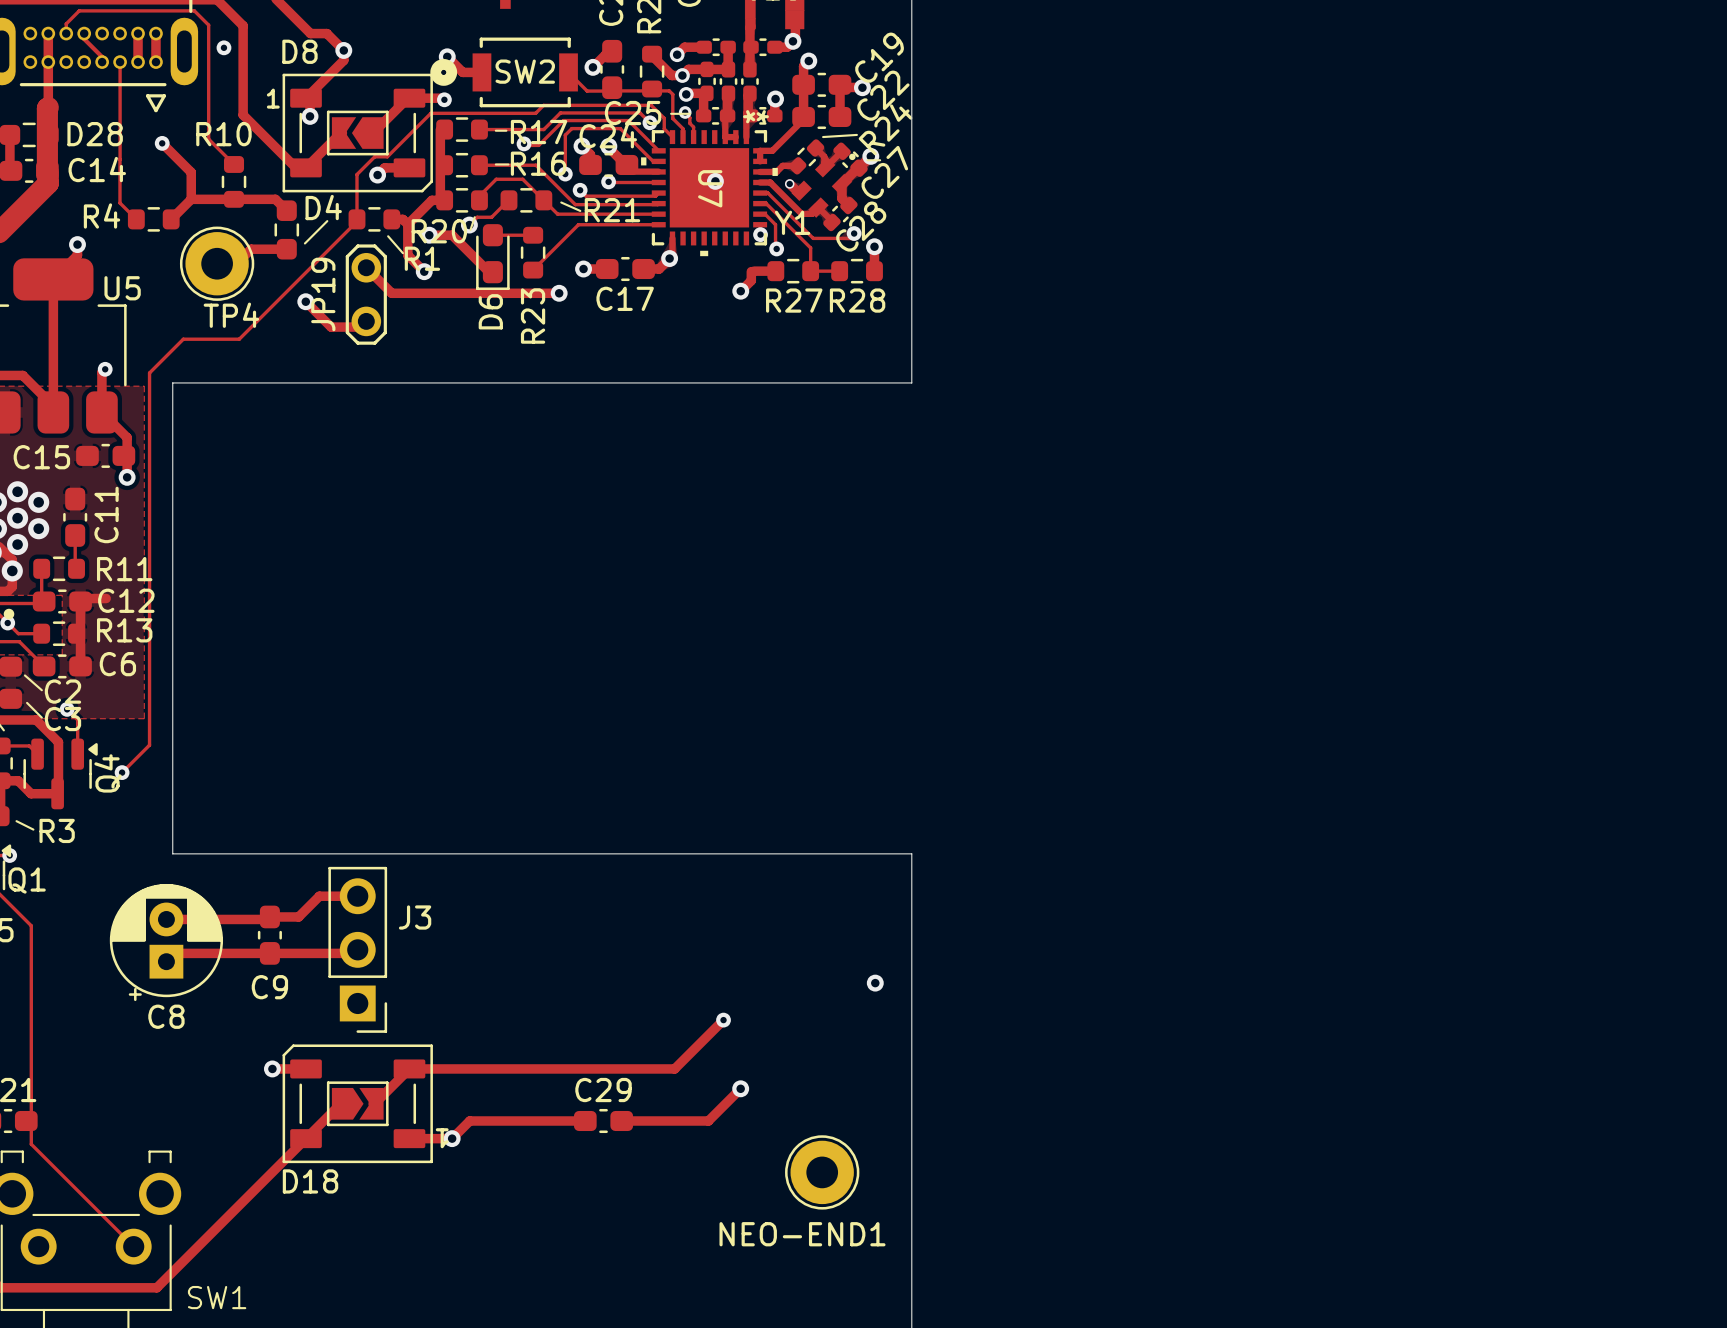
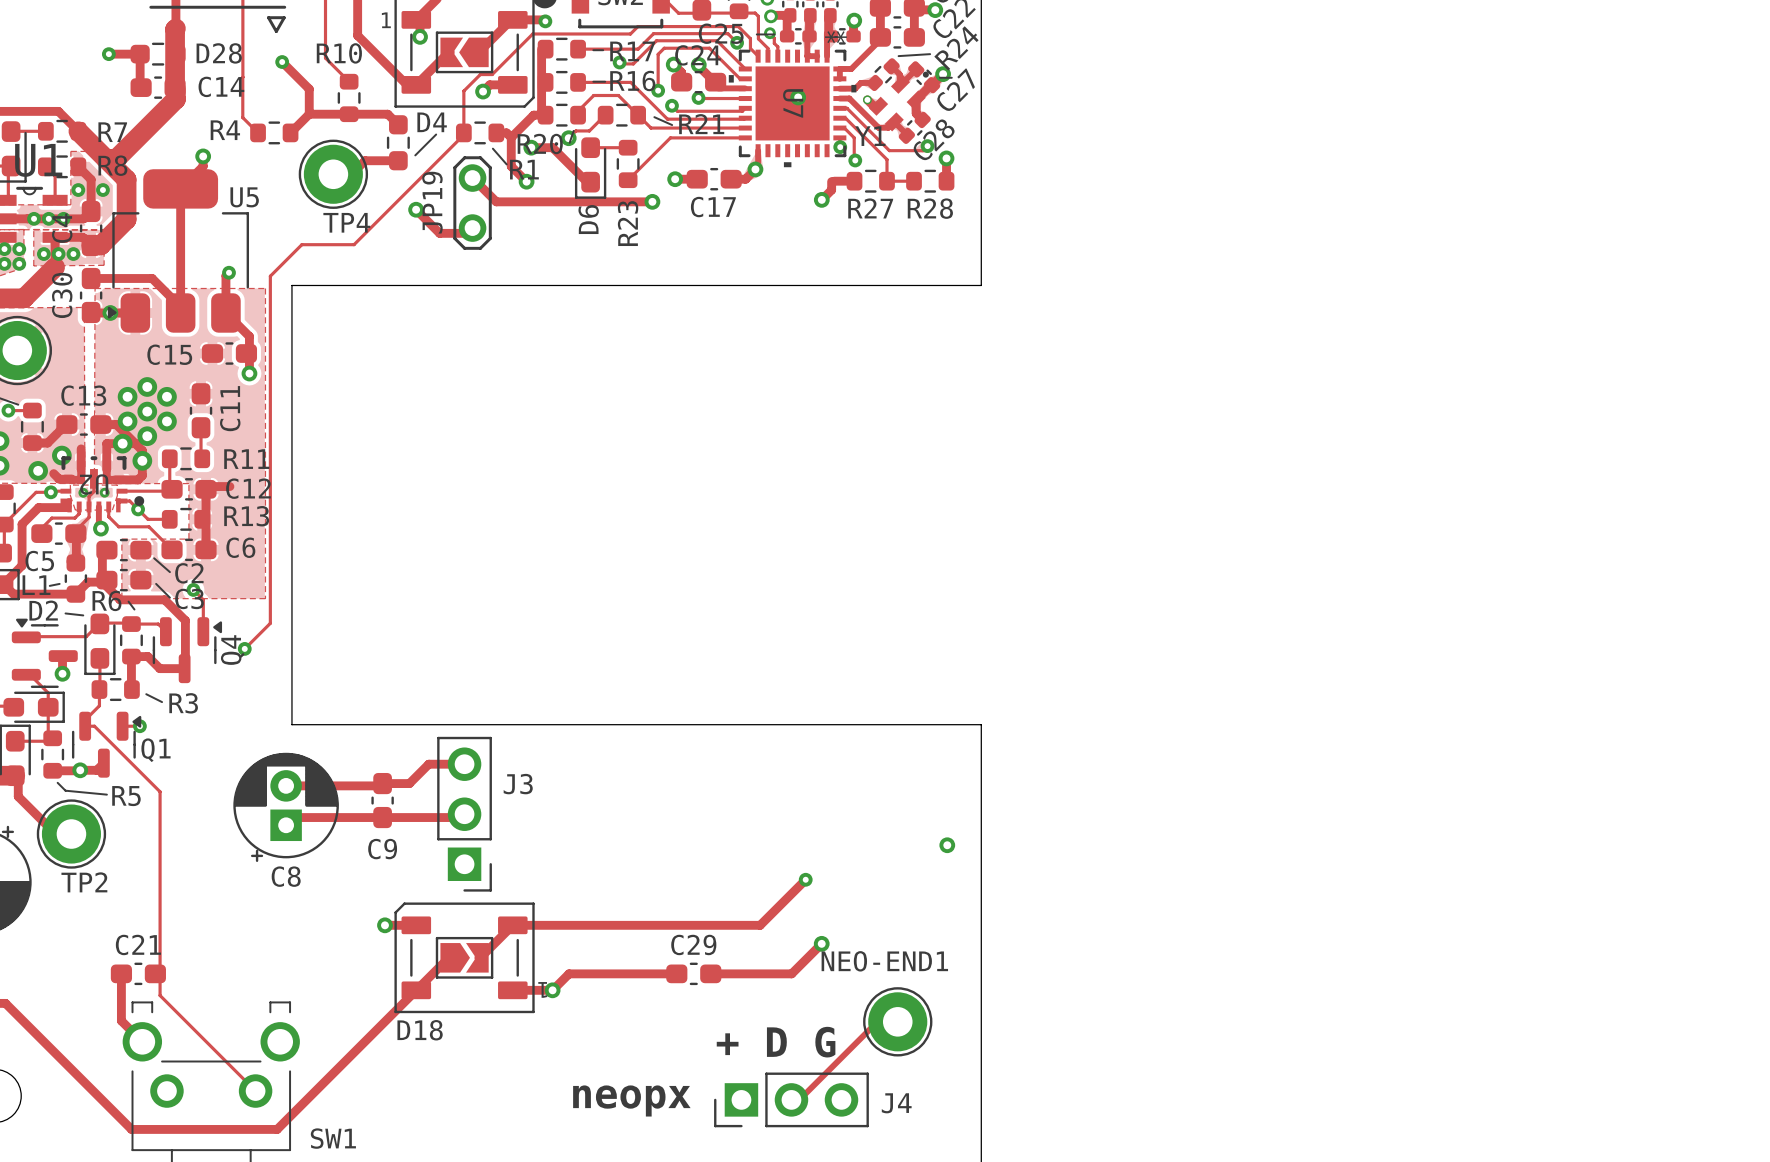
track: none -> (897, 1021) (877, 1021) (791, 1107)
text: none -> + D G (776, 1042)
NEO-END1 name position: NEO-END1 (802, 1234) -> NEO-END1 (884, 961)
J4: none -> (791, 1099)
text: none -> neopx (631, 1100)

